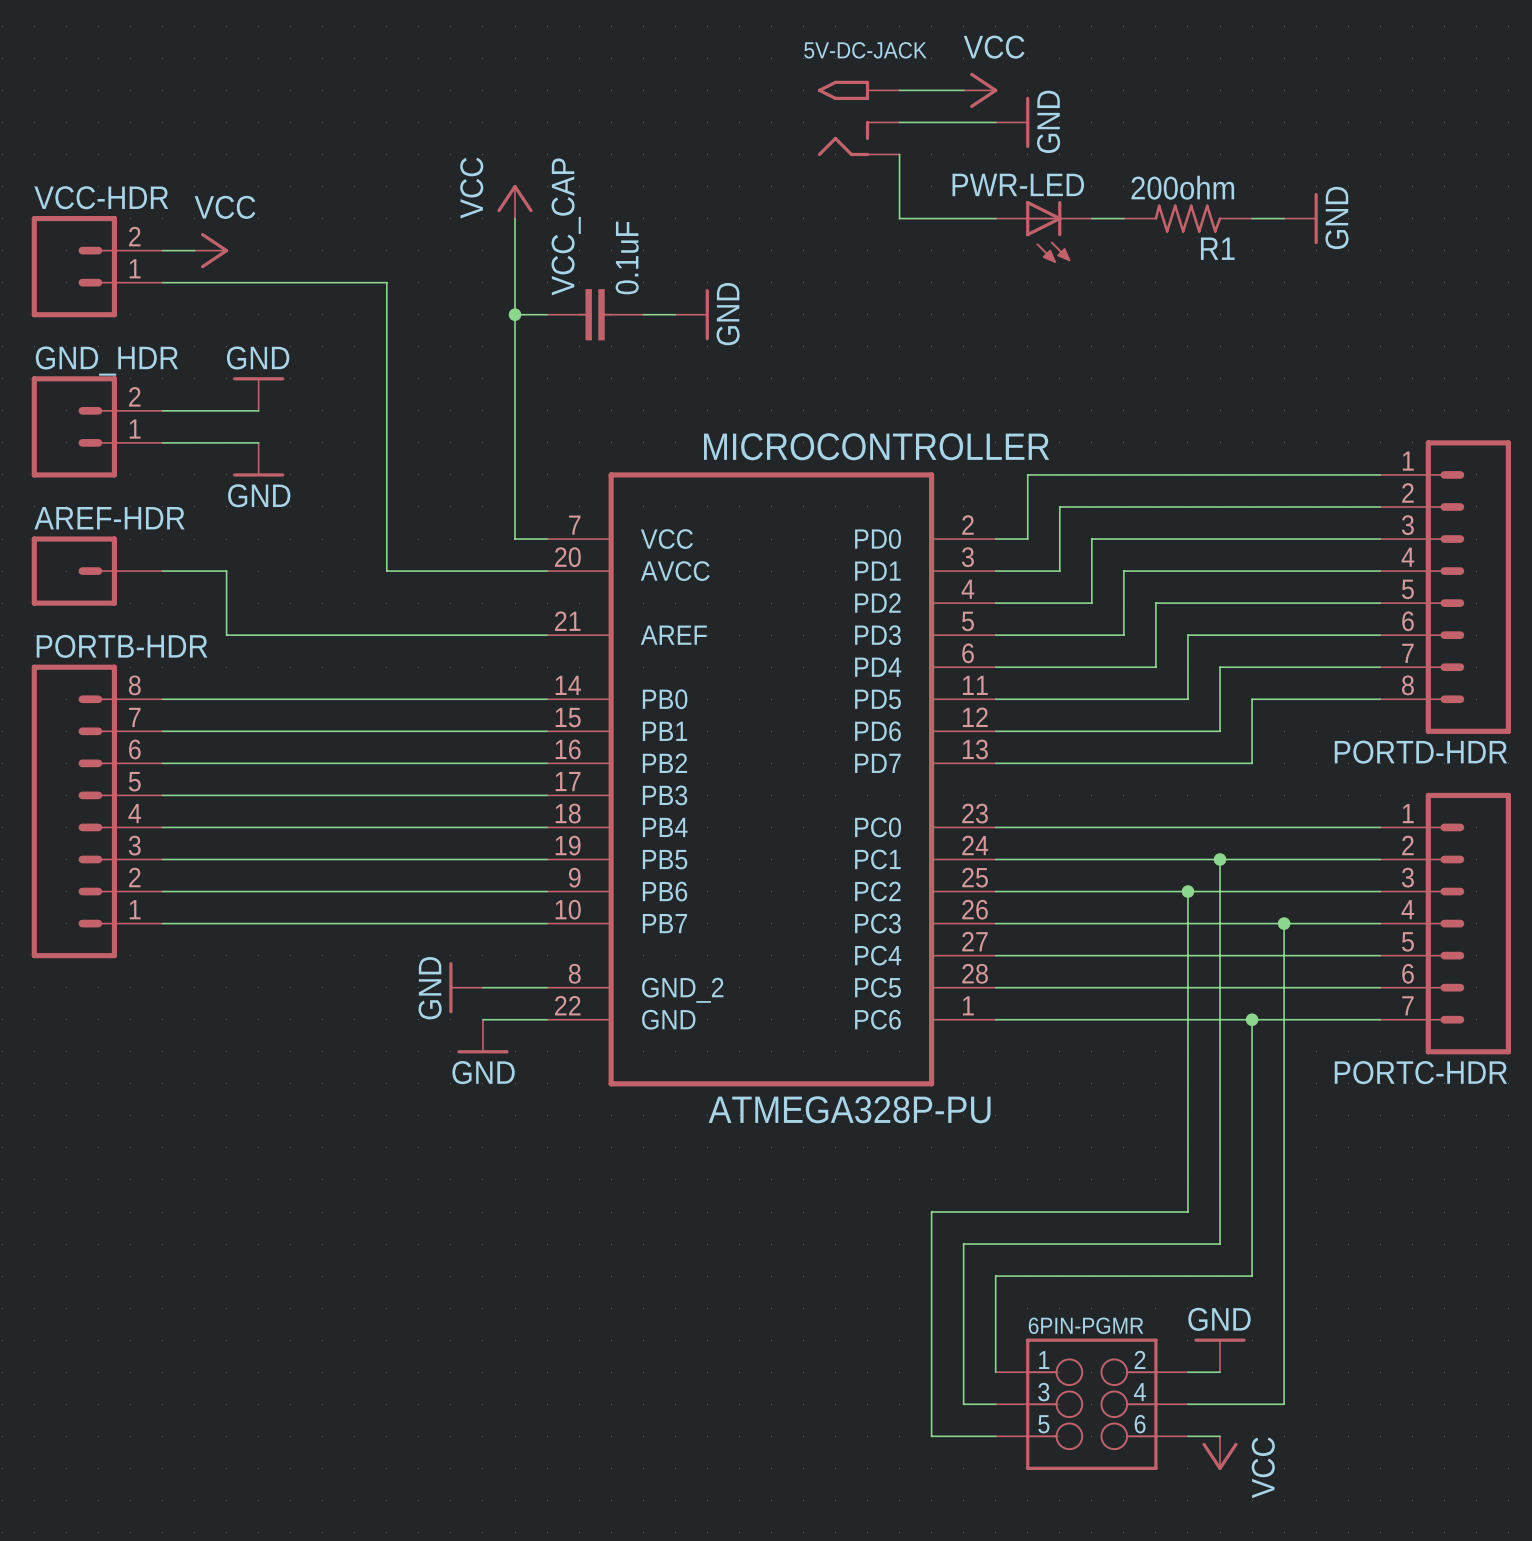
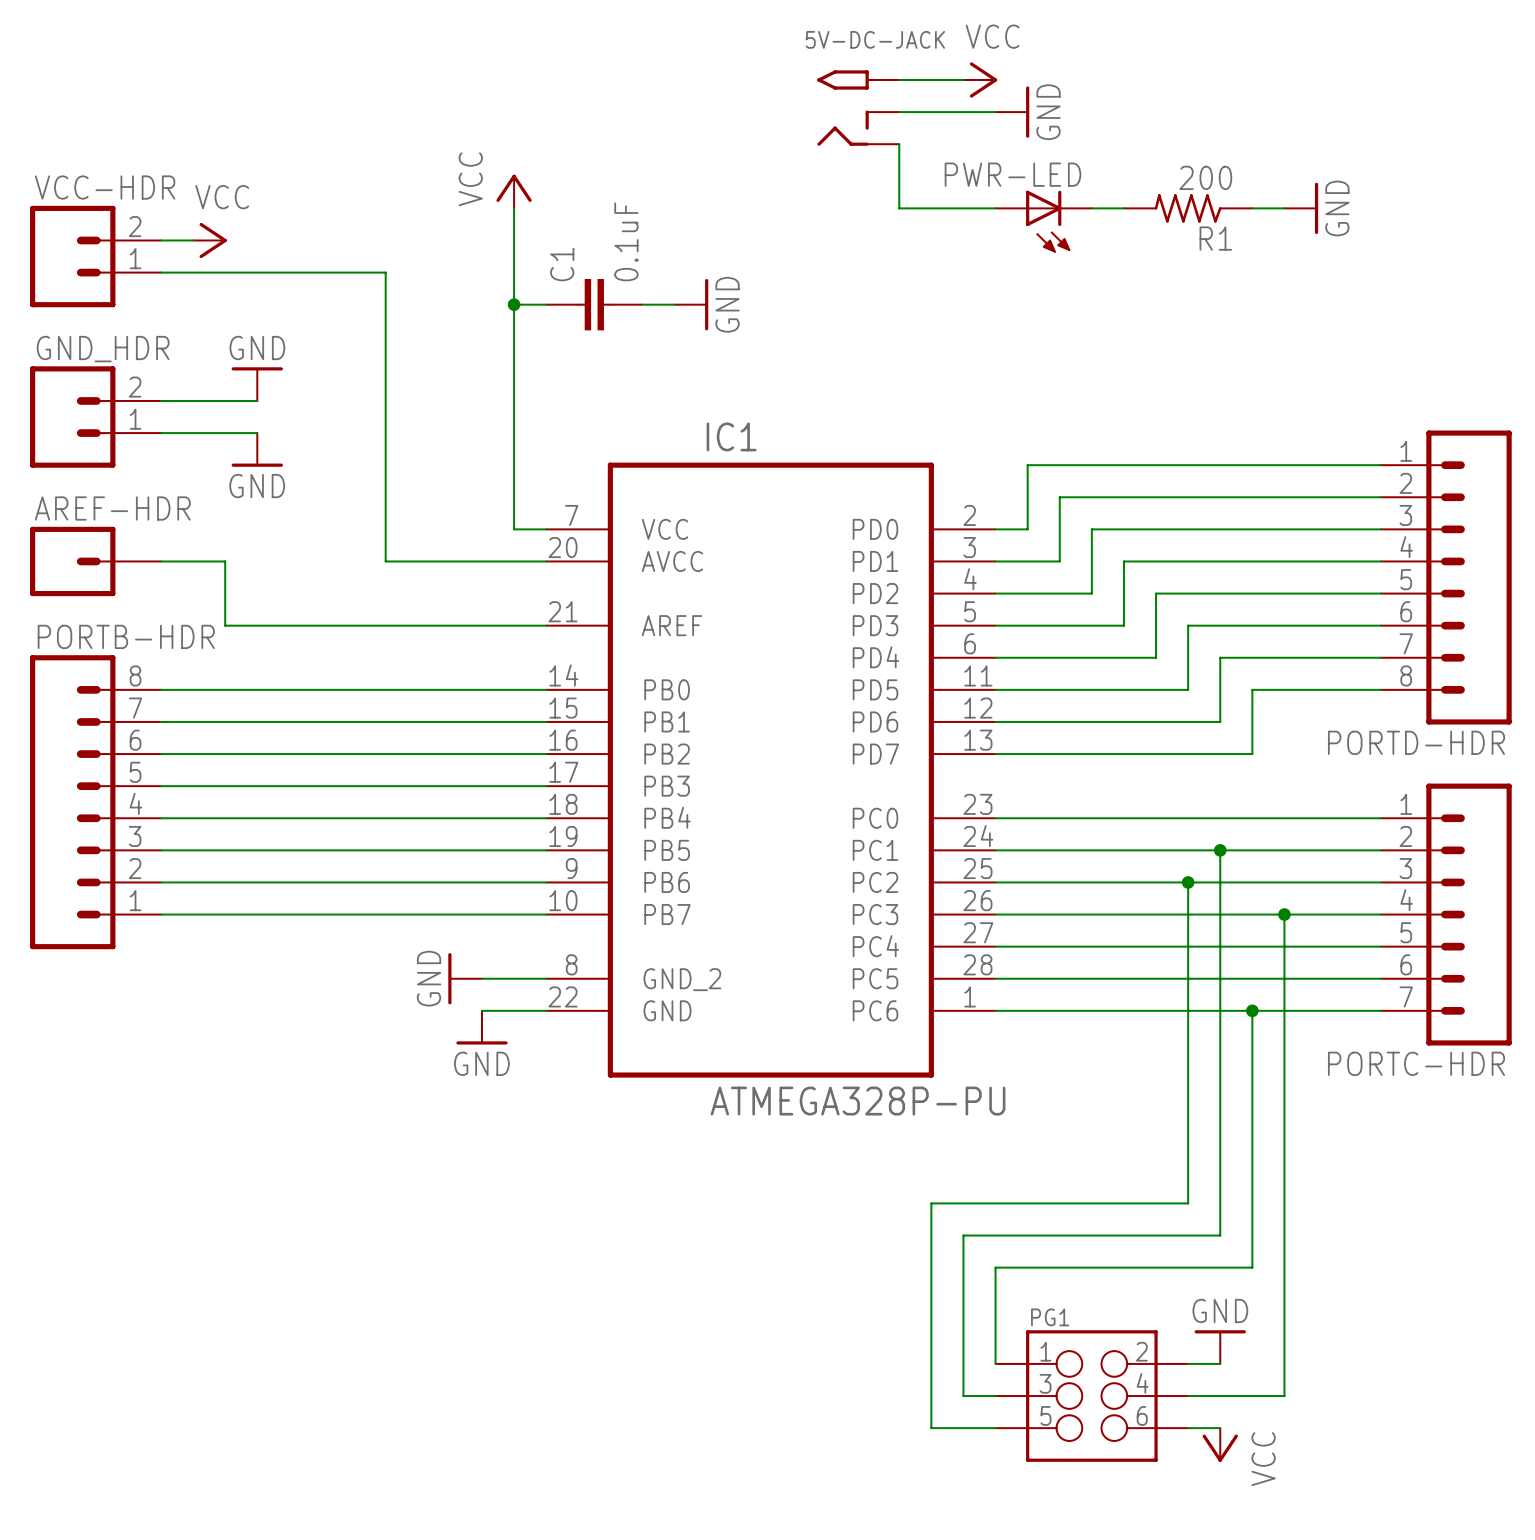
R1 value: 200ohm (1182, 187) -> 200 (1205, 177)
VCC_CAP name: VCC_CAP (566, 226) -> C1 (562, 264)
MICROCONTROLLER name: MICROCONTROLLER (876, 446) -> IC1 (731, 436)
6PIN-PGMR name: 6PIN-PGMR (1086, 1325) -> PG1 (1050, 1317)

